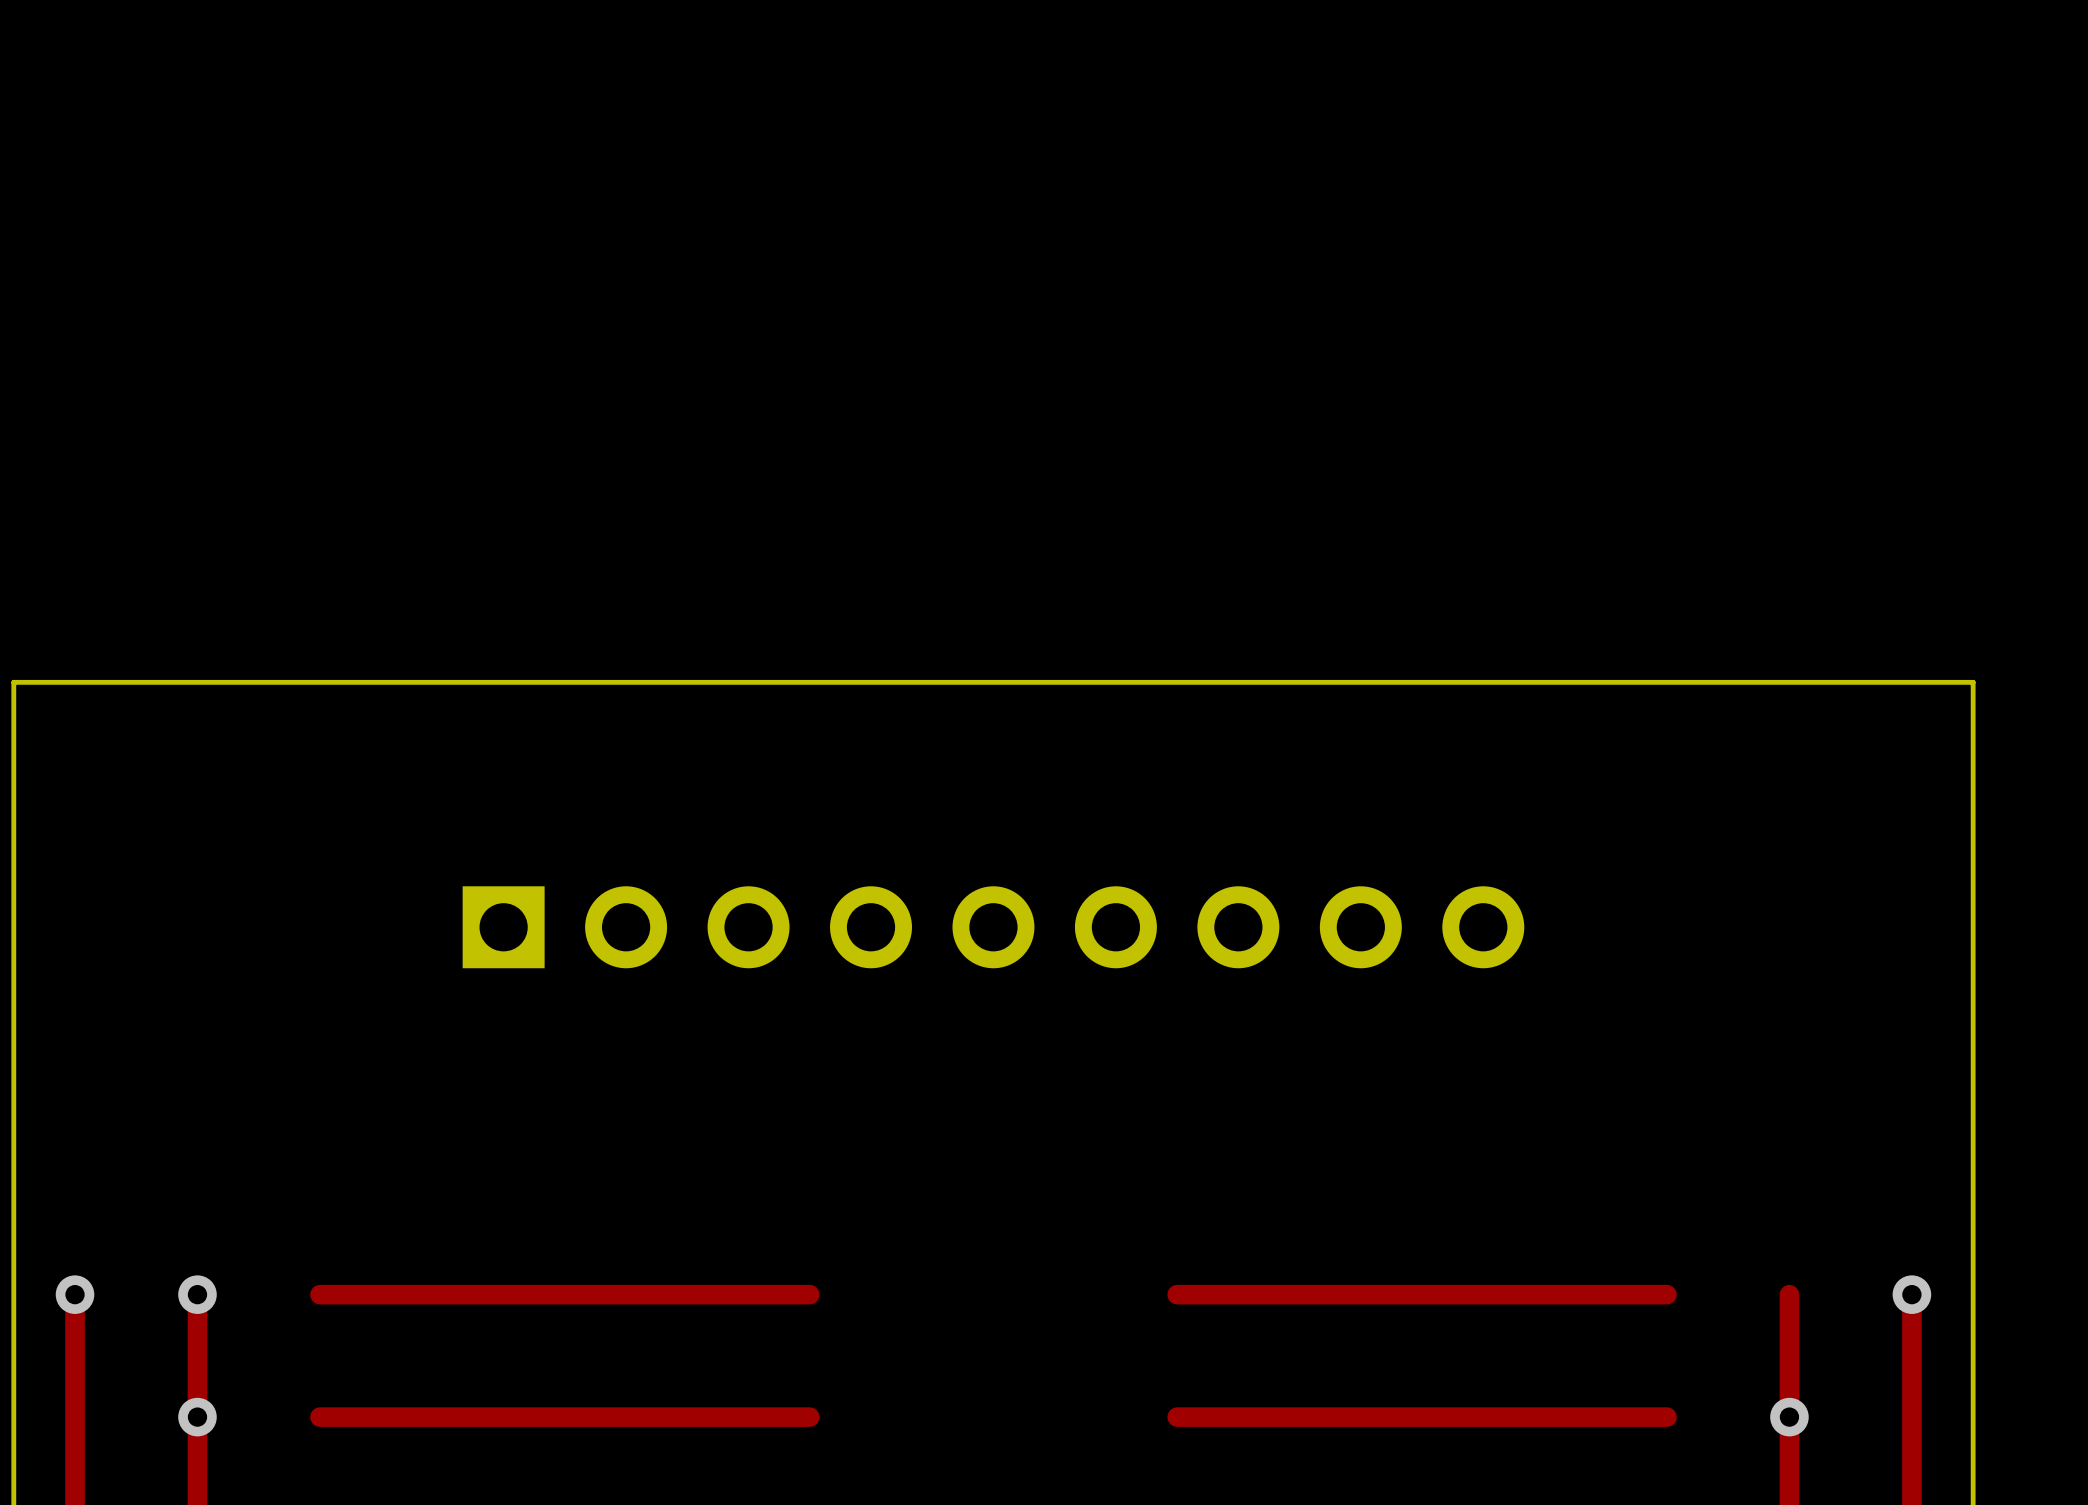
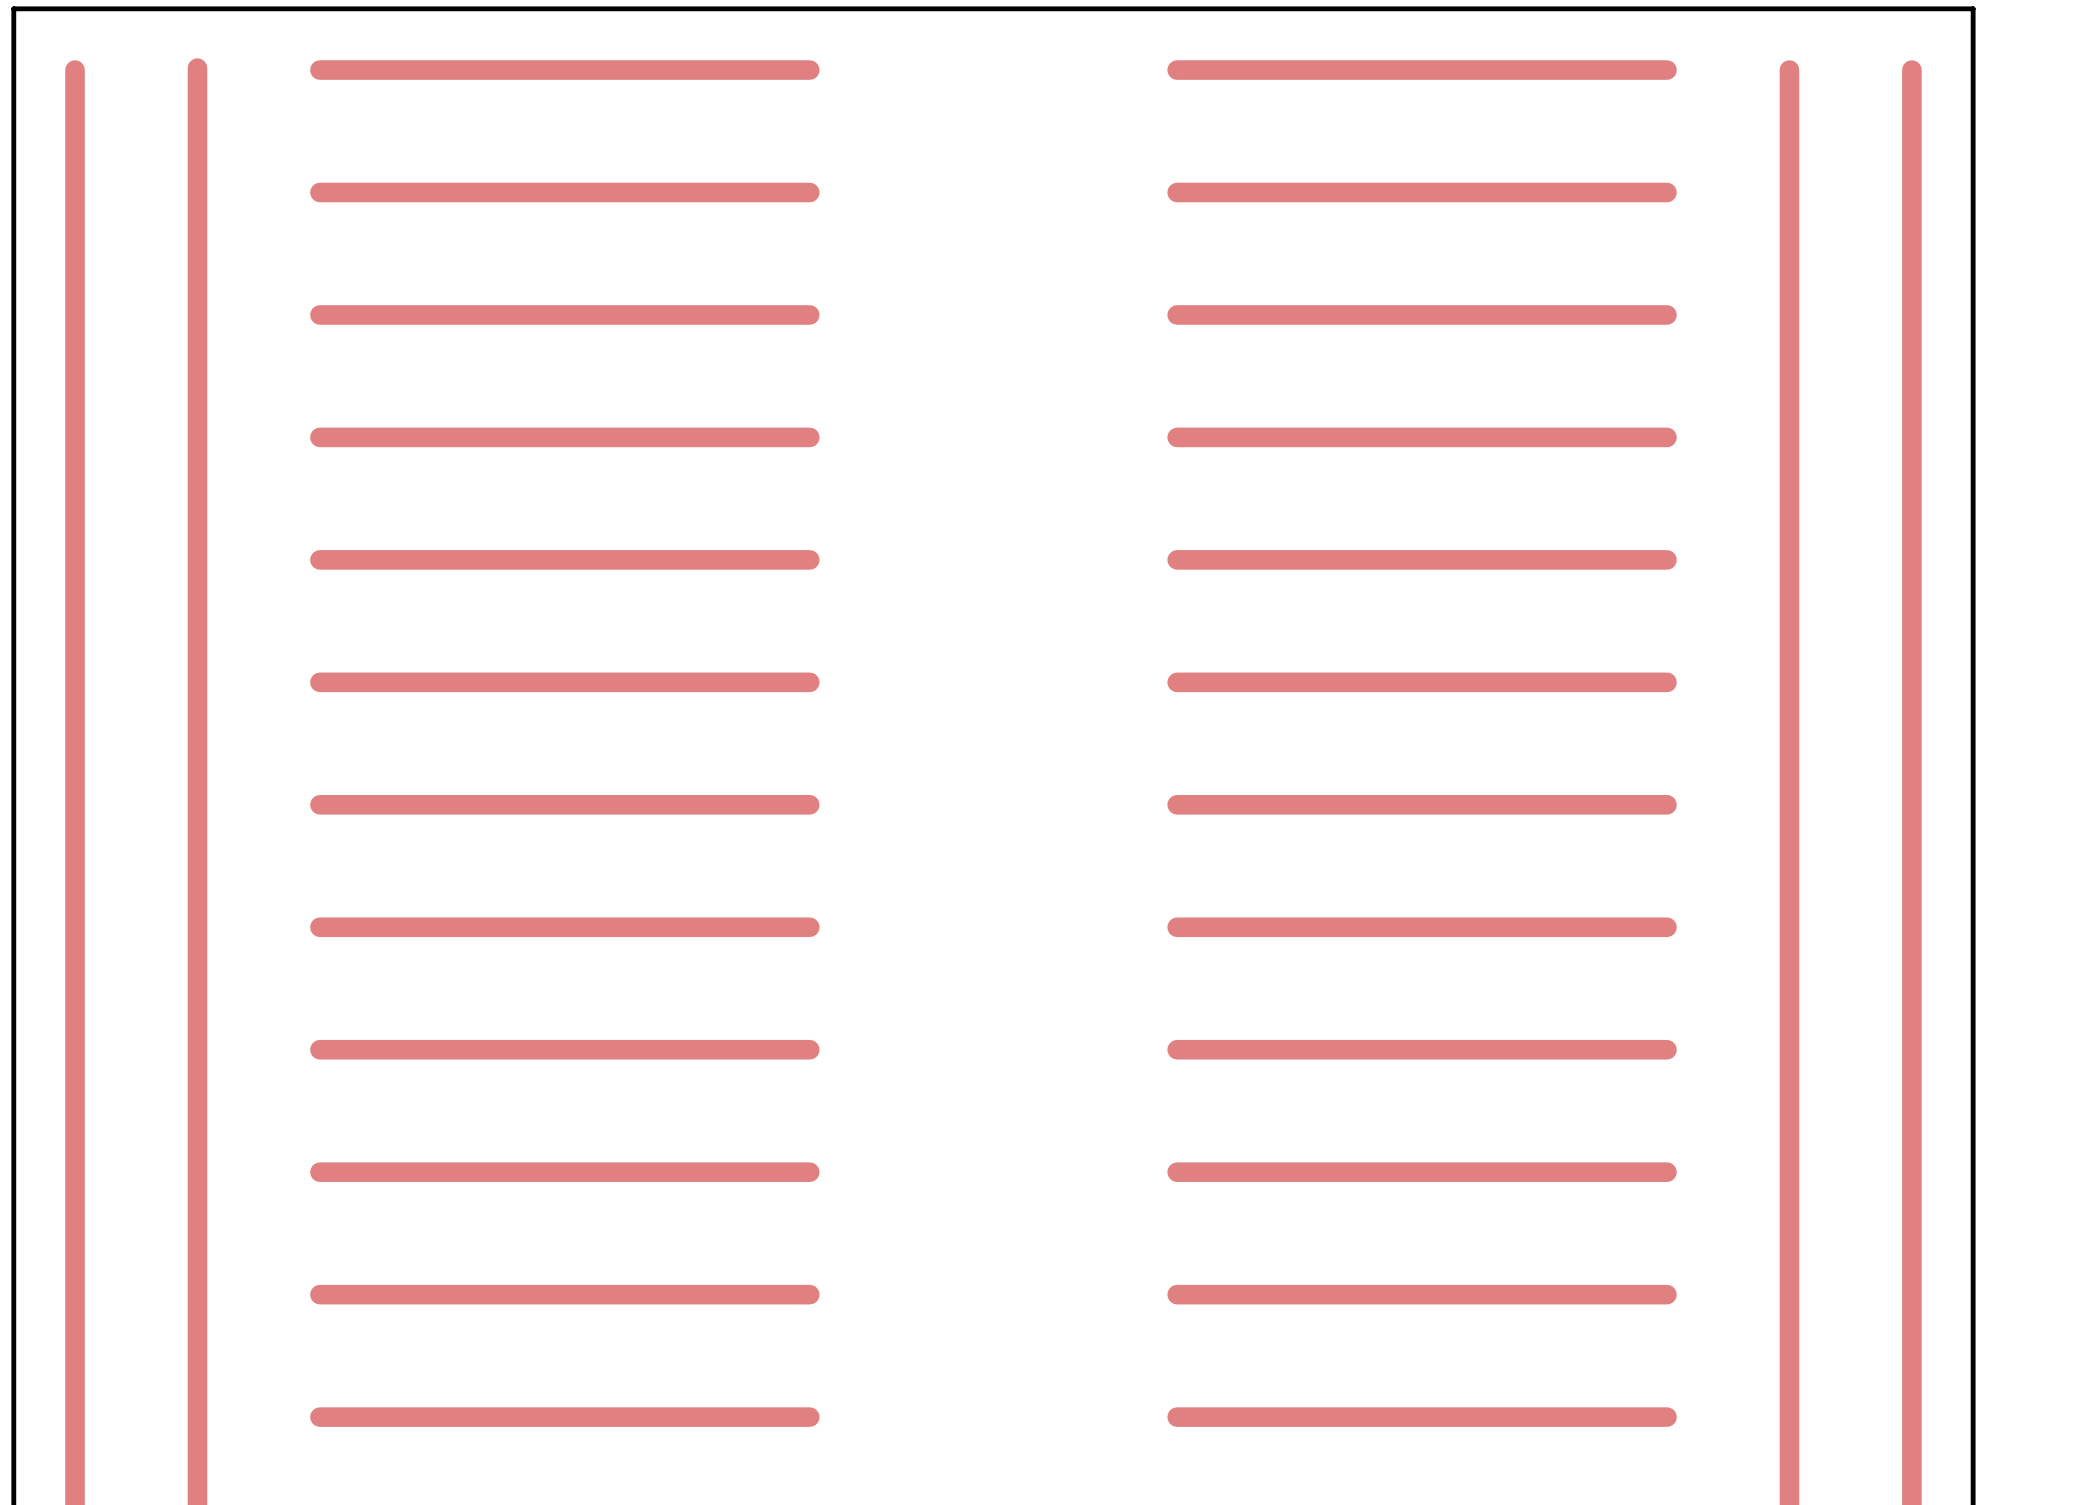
top track: none -> (197, 68) (197, 1292)
top track: none -> (75, 70) (75, 1294)
top track: none -> (809, 70) (319, 70)
top track: none -> (1666, 70) (1177, 70)
top track: none -> (1789, 70) (1789, 1294)
top track: none -> (1911, 70) (1911, 1294)
top track: none -> (809, 192) (319, 192)
top track: none -> (1666, 192) (1177, 192)
top track: none -> (809, 314) (319, 314)
top track: none -> (1666, 314) (1177, 314)
top track: none -> (809, 437) (319, 437)
top track: none -> (1666, 437) (1177, 437)
top track: none -> (809, 559) (319, 559)
top track: none -> (1666, 559) (1177, 559)
top track: none -> (809, 682) (319, 682)
top track: none -> (1666, 682) (1177, 682)
board edge: (1973, 682) (13, 682) -> (1973, 682) (1973, 8) (13, 8) (13, 682)
top track: none -> (809, 804) (319, 804)
top track: none -> (1666, 804) (1177, 804)
top track: none -> (809, 927) (319, 927)
part: (993, 927) -> none
top track: none -> (1666, 927) (1177, 927)
top track: none -> (809, 1049) (319, 1049)
top track: none -> (1666, 1049) (1177, 1049)
top track: none -> (809, 1172) (319, 1172)
top track: none -> (1666, 1172) (1177, 1172)
via: (75, 1294) -> none
via: (197, 1294) -> none
via: (1911, 1294) -> none
via: (197, 1417) -> none
via: (1789, 1417) -> none

